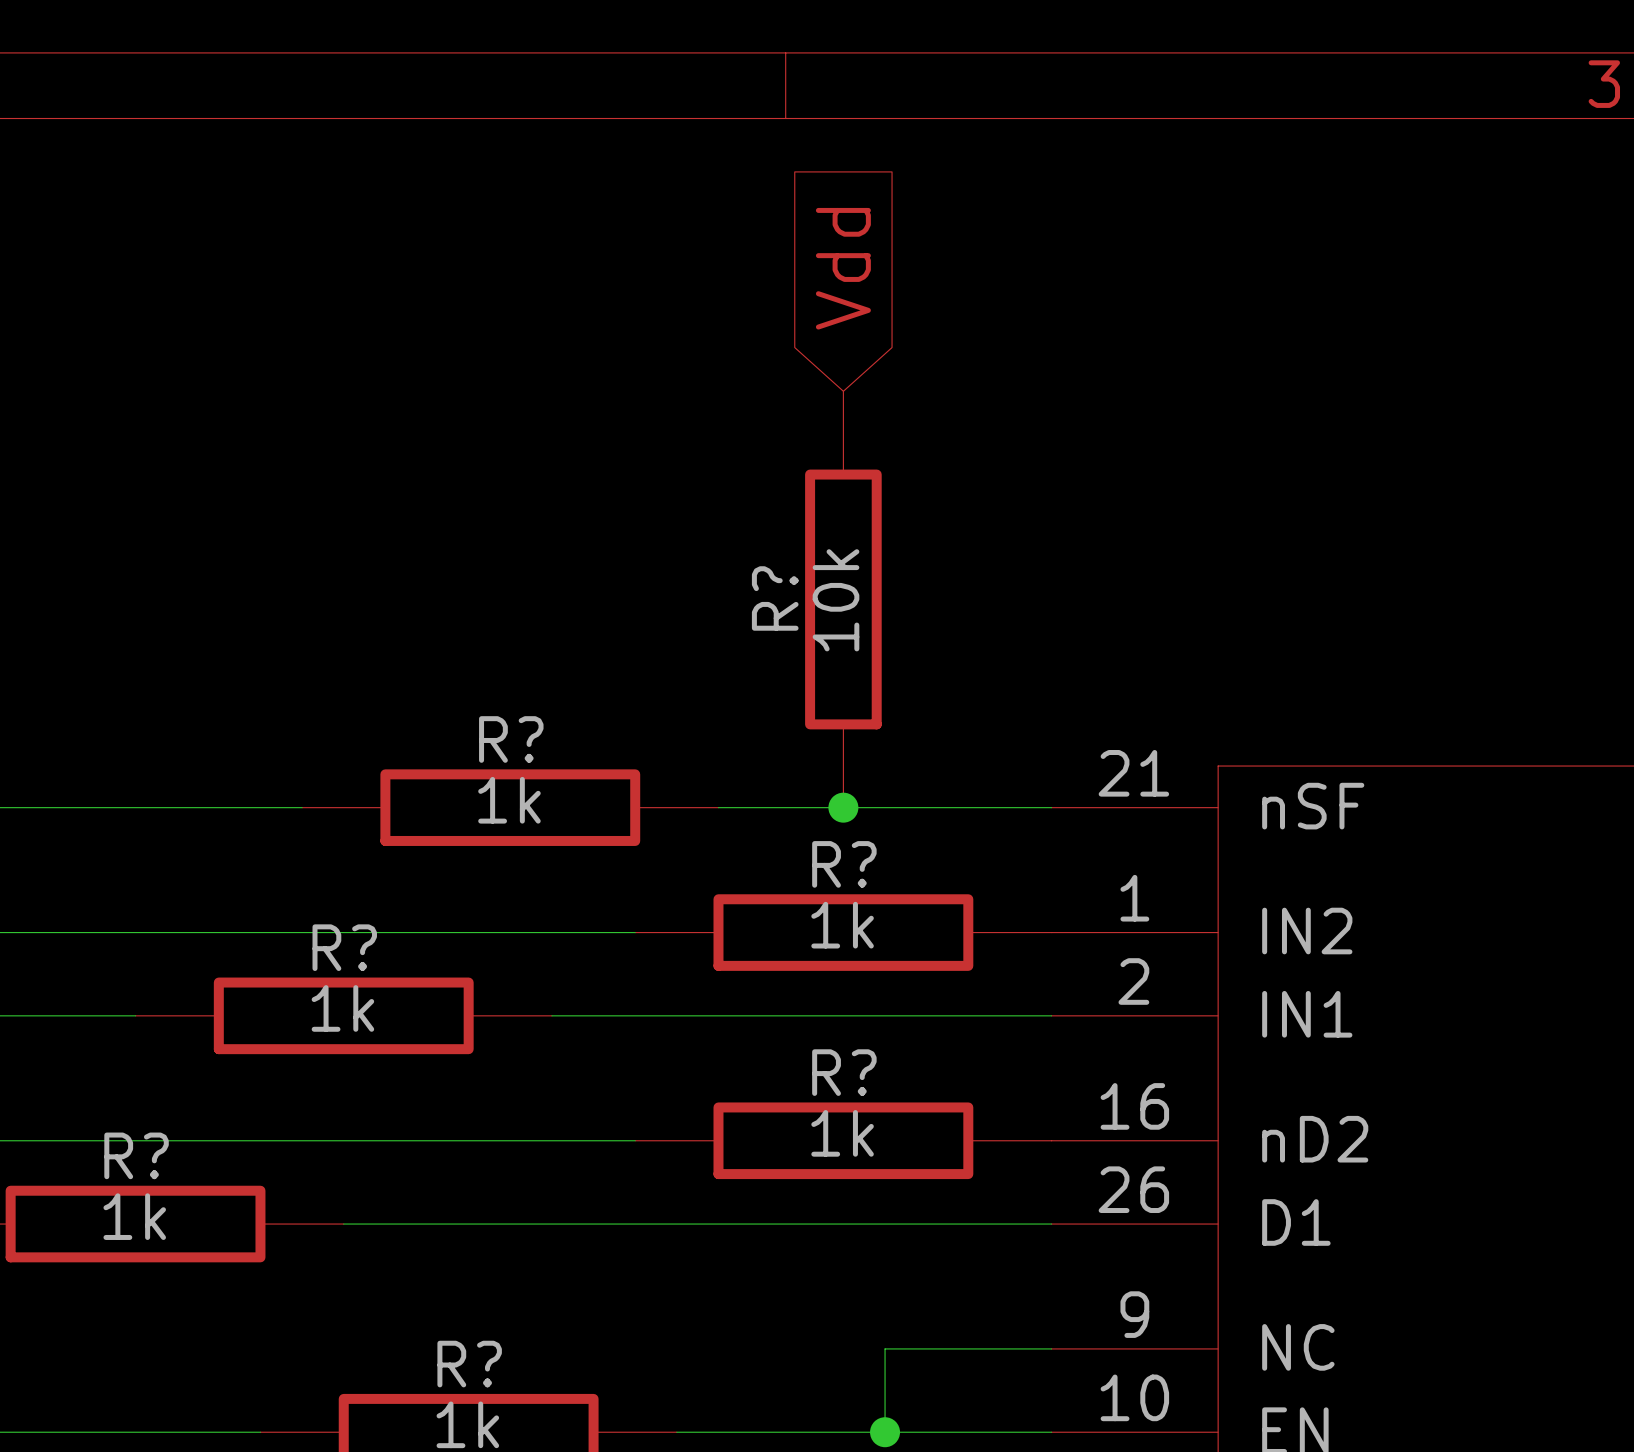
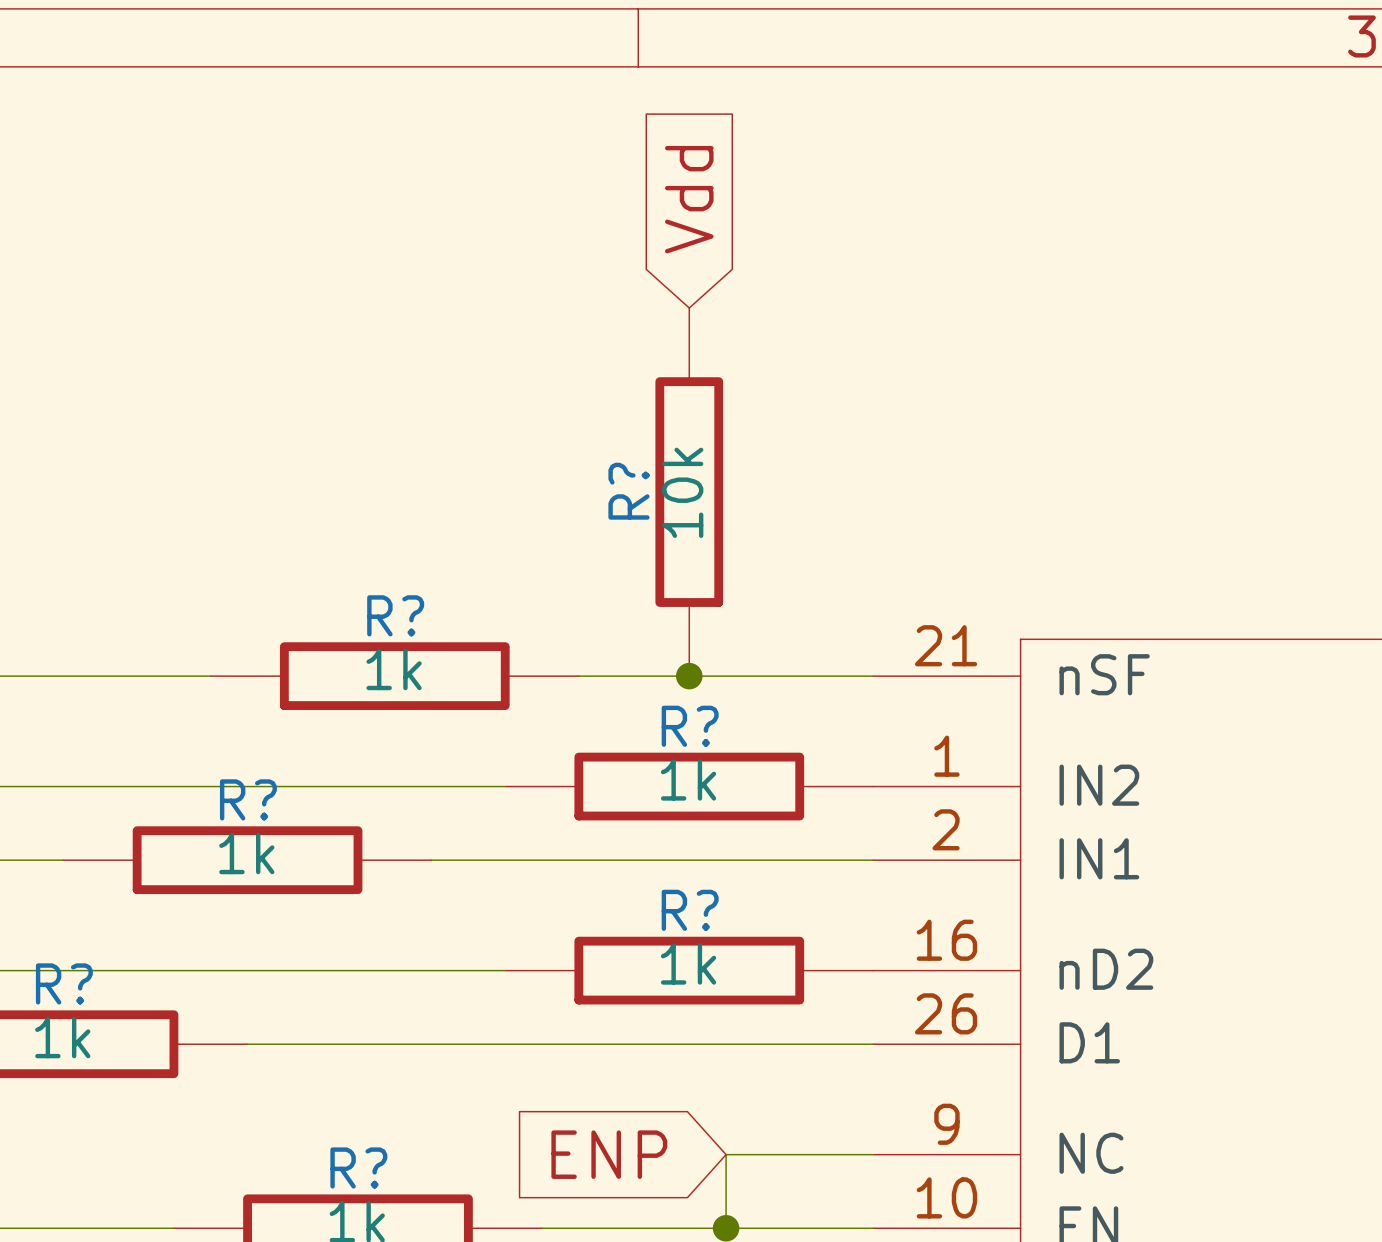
global label: none -> ENP (609, 1154)

